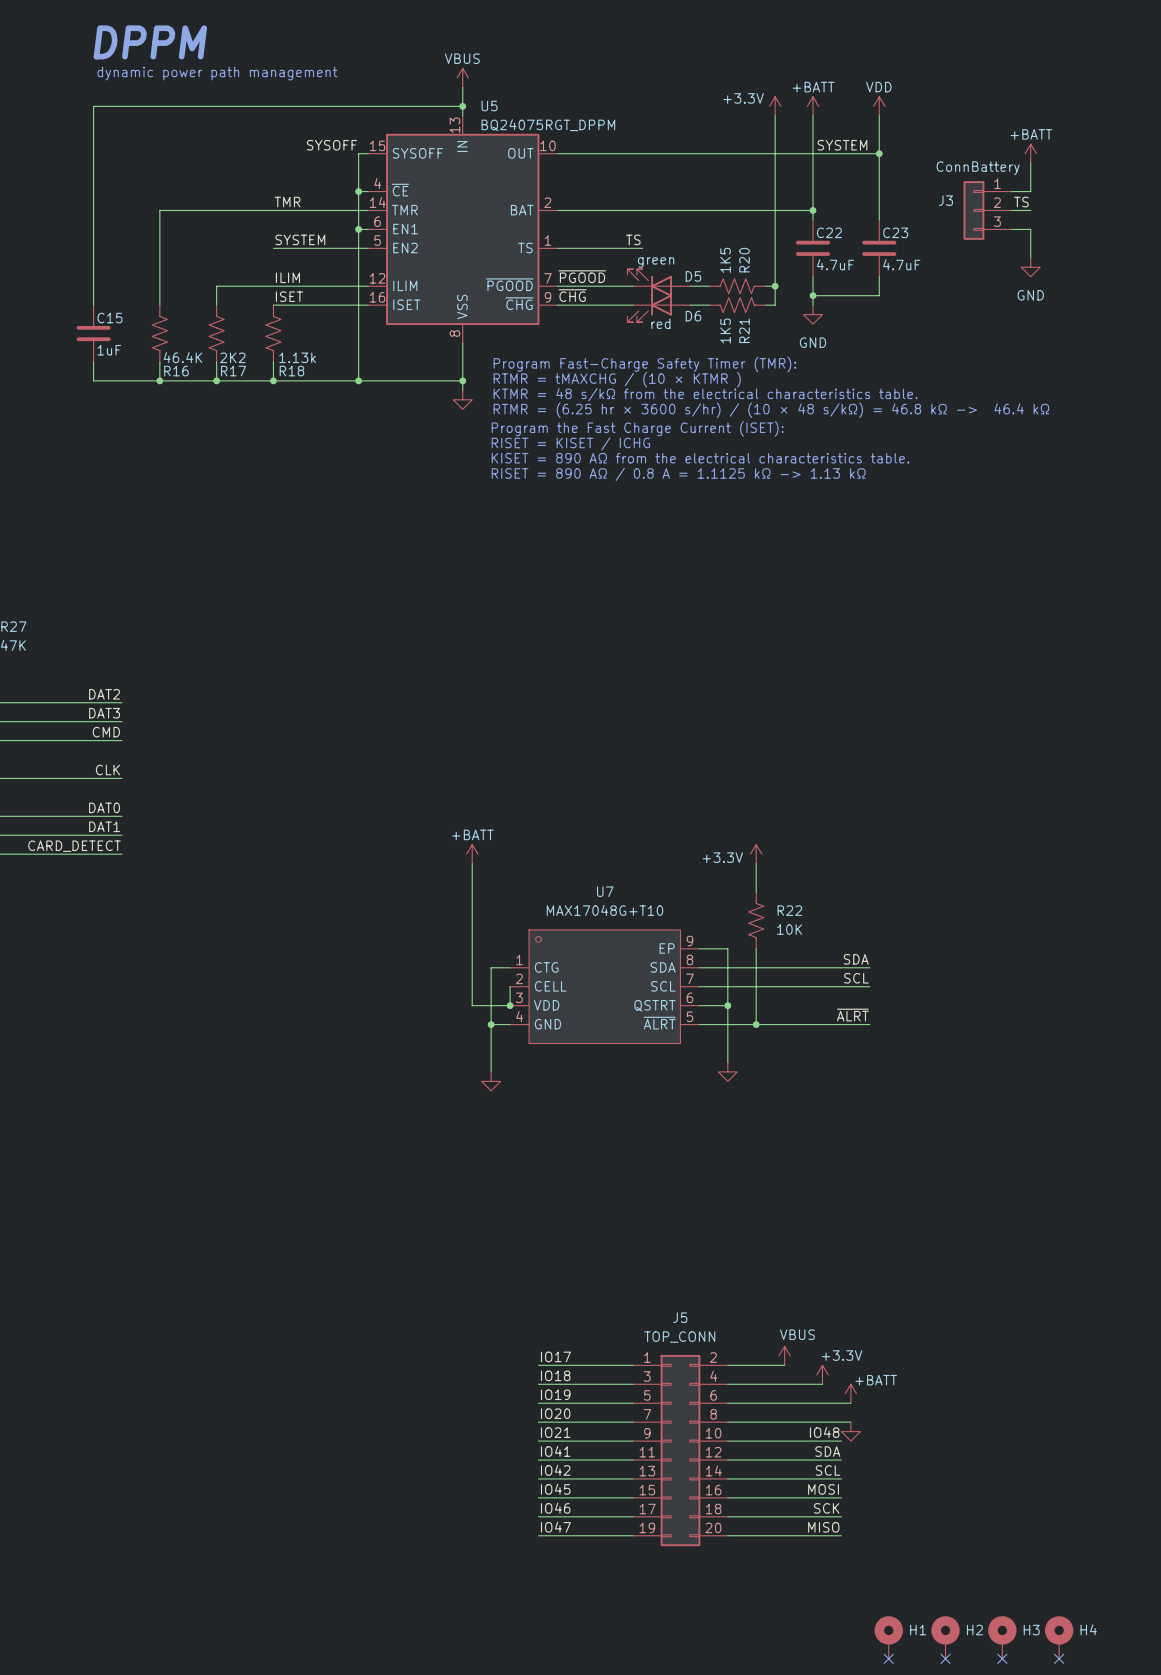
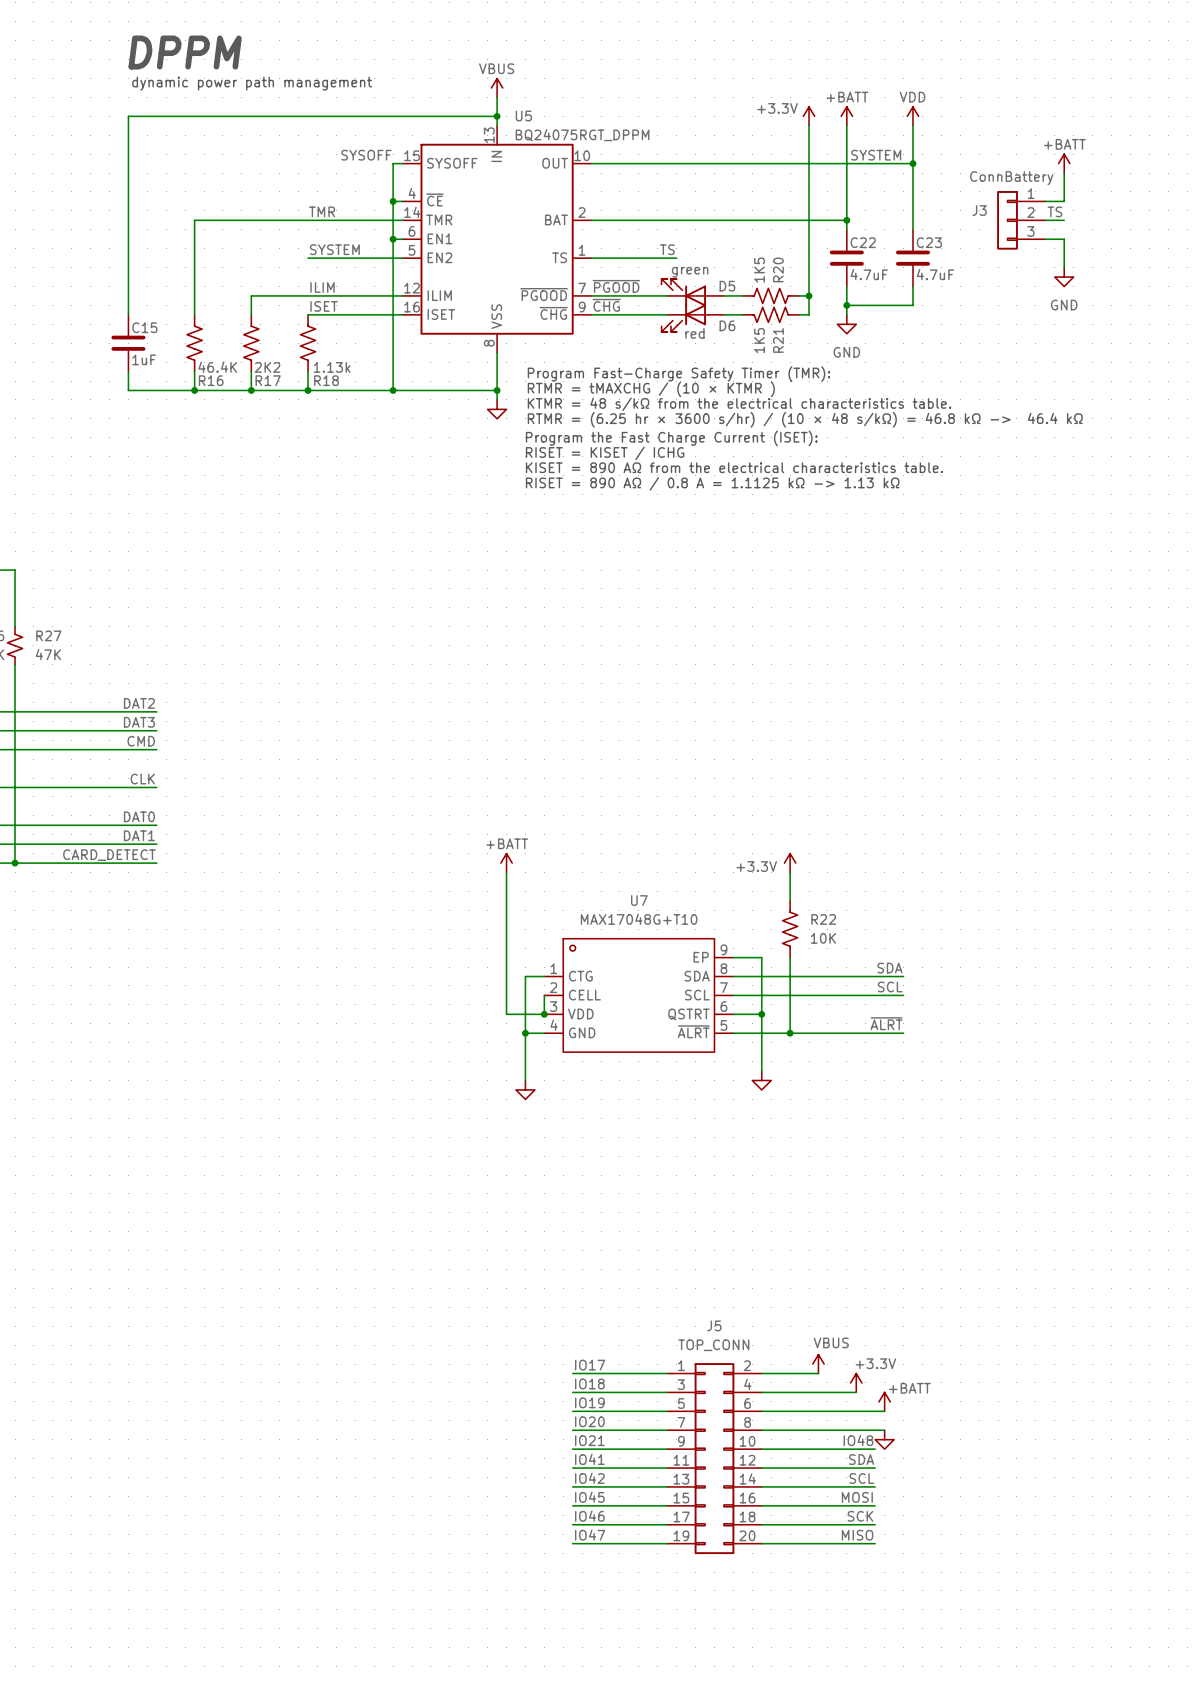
H1: (888, 1637) -> none
H2: (945, 1637) -> none
H3: (1002, 1637) -> none
H4: (1059, 1637) -> none
no-connect mark: (888, 1658) -> none
no-connect mark: (945, 1658) -> none
no-connect mark: (1002, 1658) -> none
no-connect mark: (1059, 1658) -> none

